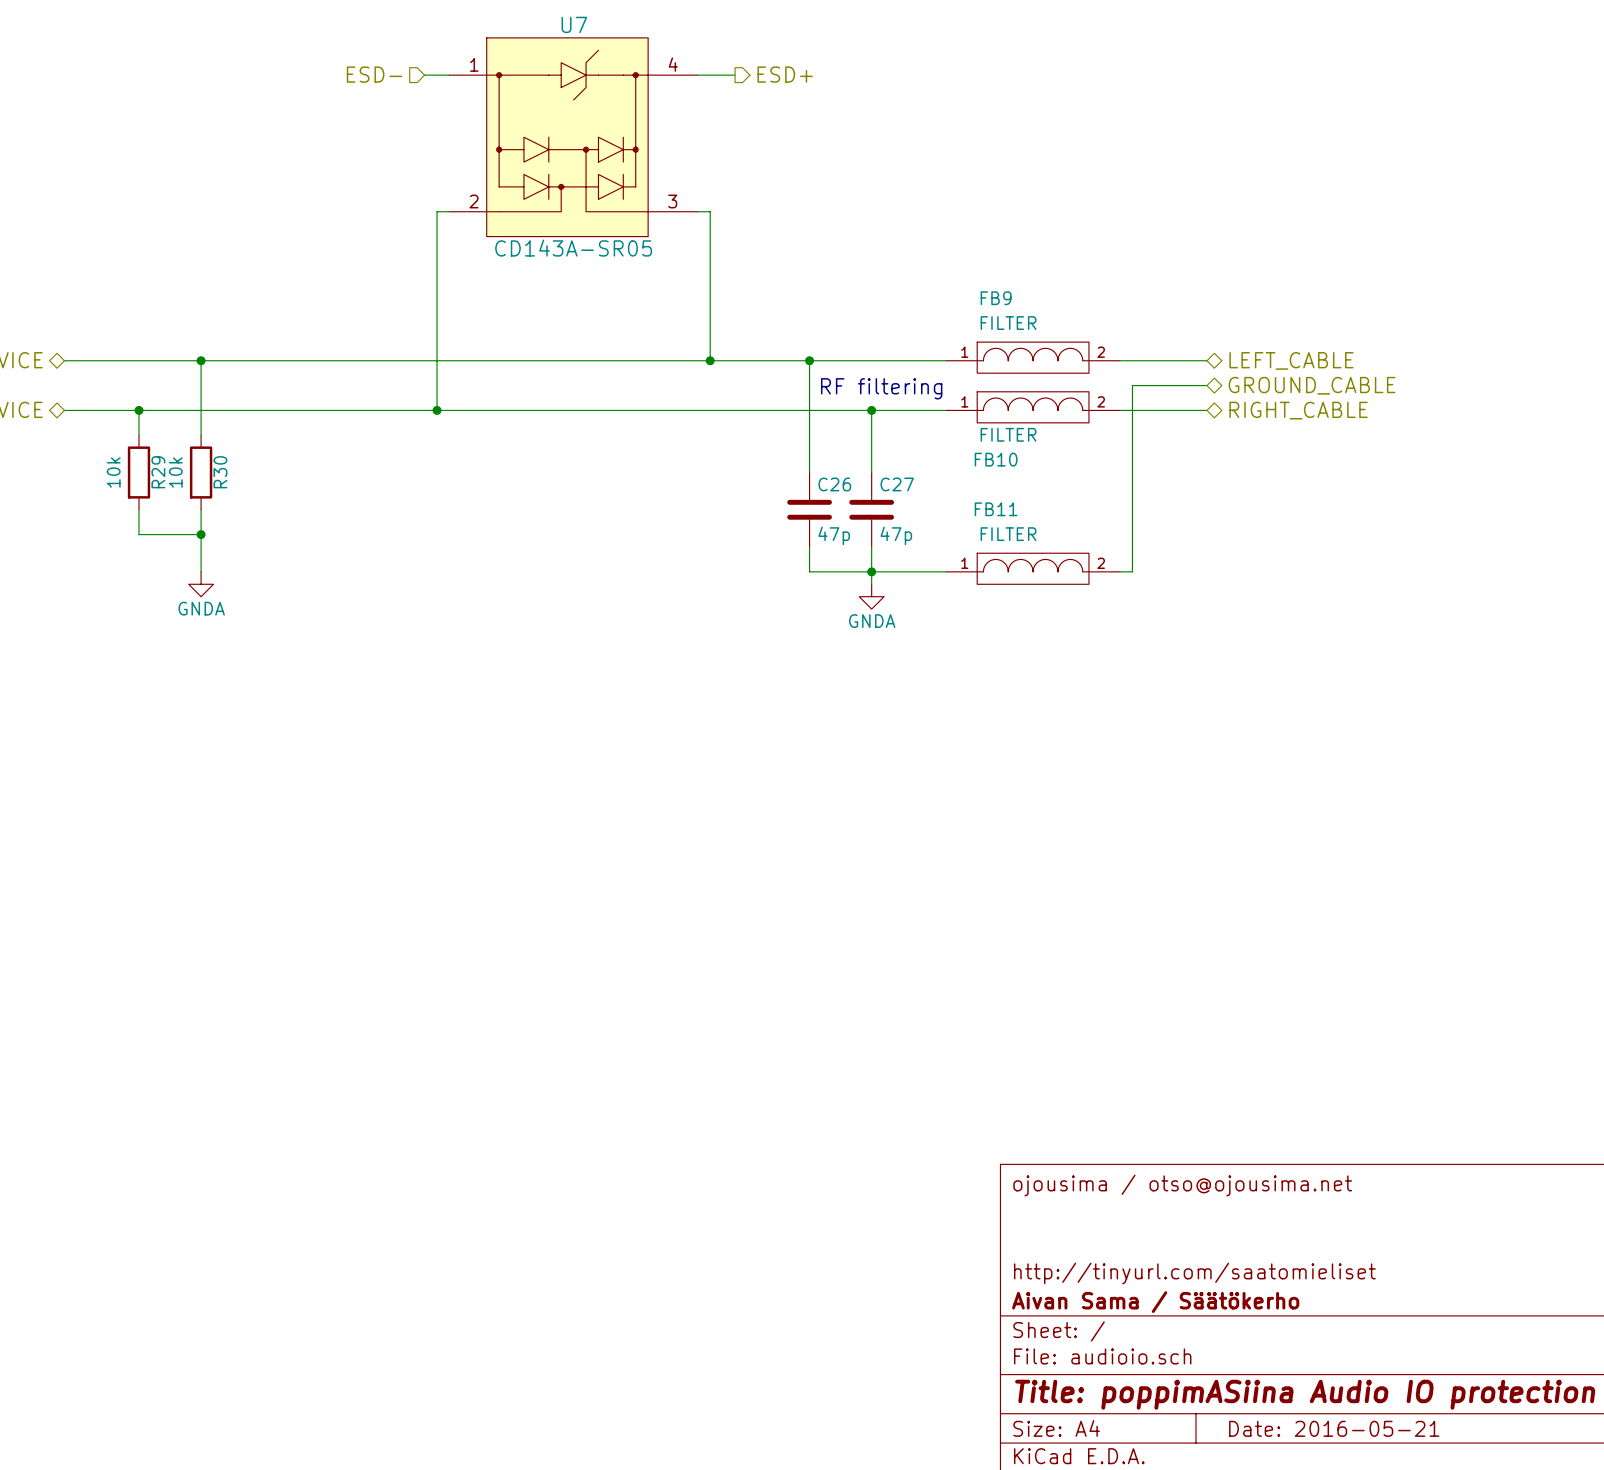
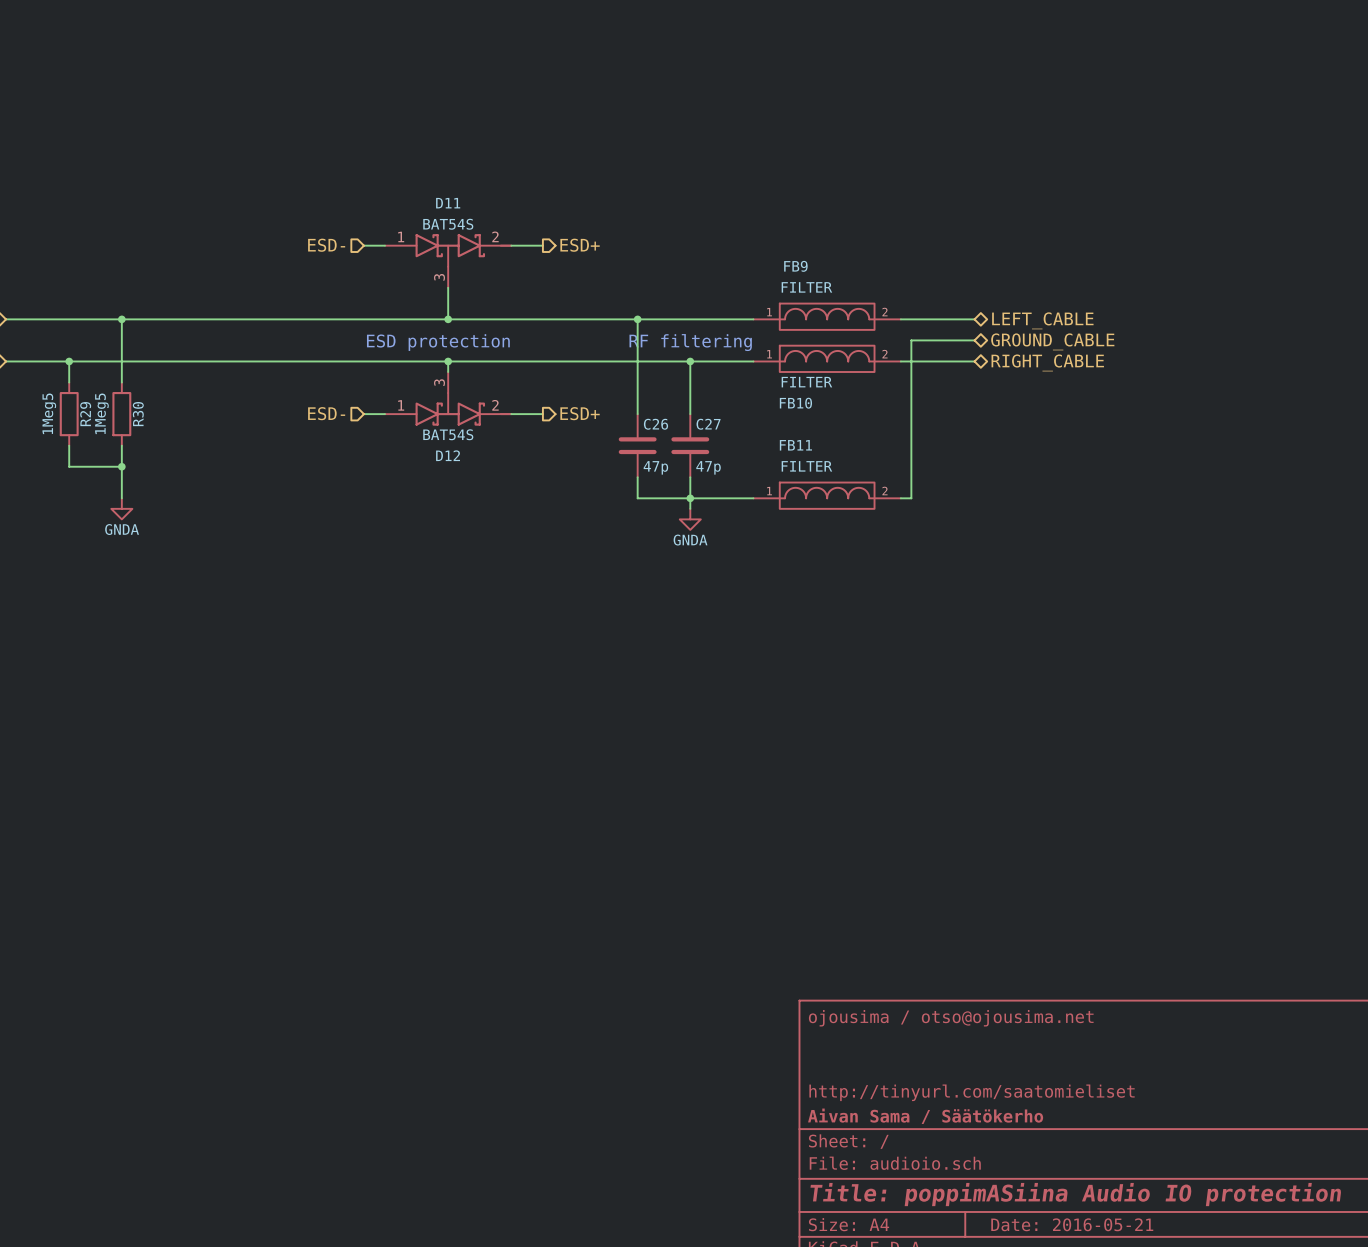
hierarchical label: ESD- (374, 74) -> none
hierarchical label: ESD+ (785, 74) -> none
wire: (424, 75) (449, 75) -> (363, 245) (385, 245)
wire: (697, 75) (735, 75) -> (511, 245) (542, 245)
U7: CD143A-SR05 (573, 137) -> none
wire: (449, 211) (437, 211) (437, 410) -> none
wire: (697, 211) (710, 211) (710, 360) -> none
hierarchical label: none -> ESD- (326, 245)
hierarchical label: none -> ESD+ (580, 245)
D11: none -> BAT54S (448, 260)
wire: none -> (448, 287) (448, 319)
junction: none -> (448, 319)
junction: (710, 360) -> none
text: none -> ESD protection (438, 342)
junction: (437, 410) -> none
wire: none -> (448, 361) (448, 372)
junction: none -> (448, 361)
D12: none -> BAT54S (448, 398)
hierarchical label: none -> ESD- (326, 413)
hierarchical label: none -> ESD+ (580, 413)
R29 value: 10k (113, 472) -> 1Meg5 (49, 413)
R30 value: 10k (175, 472) -> 1Meg5 (101, 413)
wire: none -> (363, 414) (385, 414)
wire: none -> (511, 414) (542, 414)

